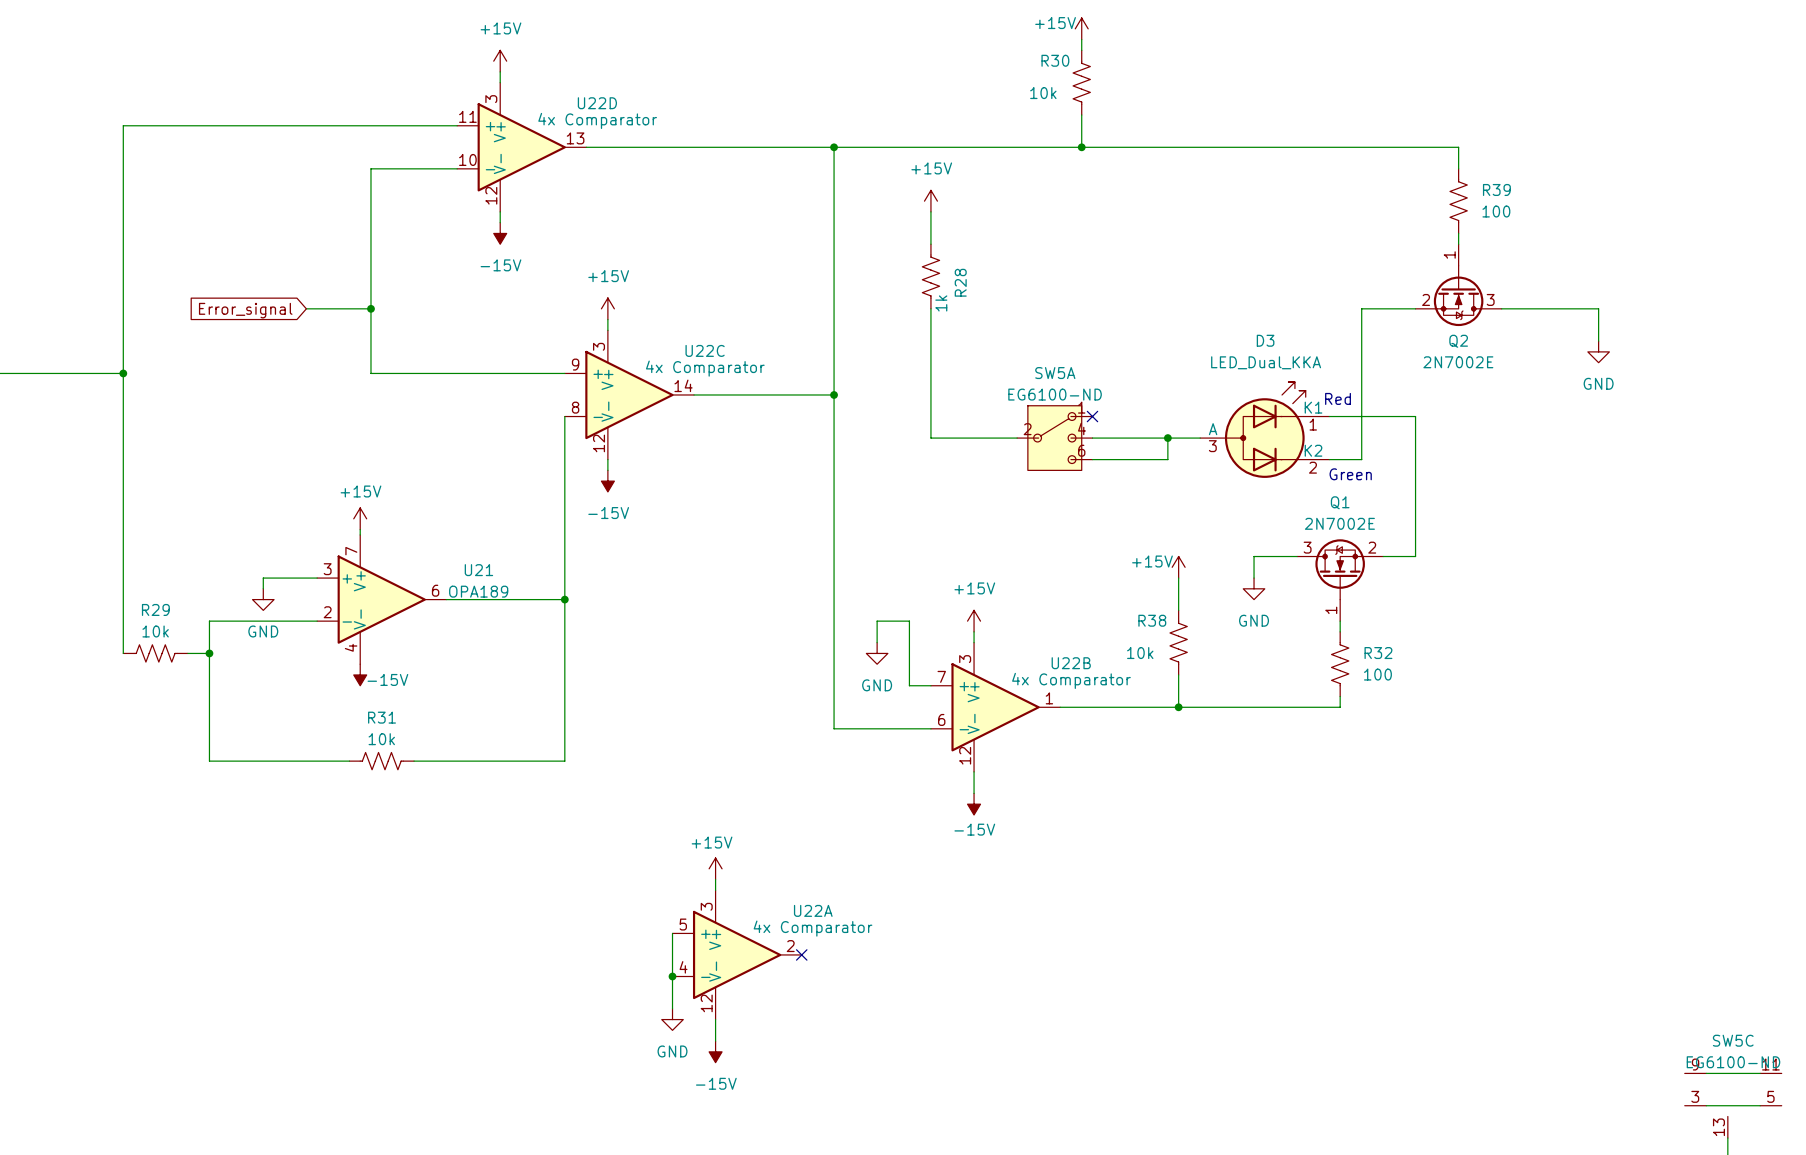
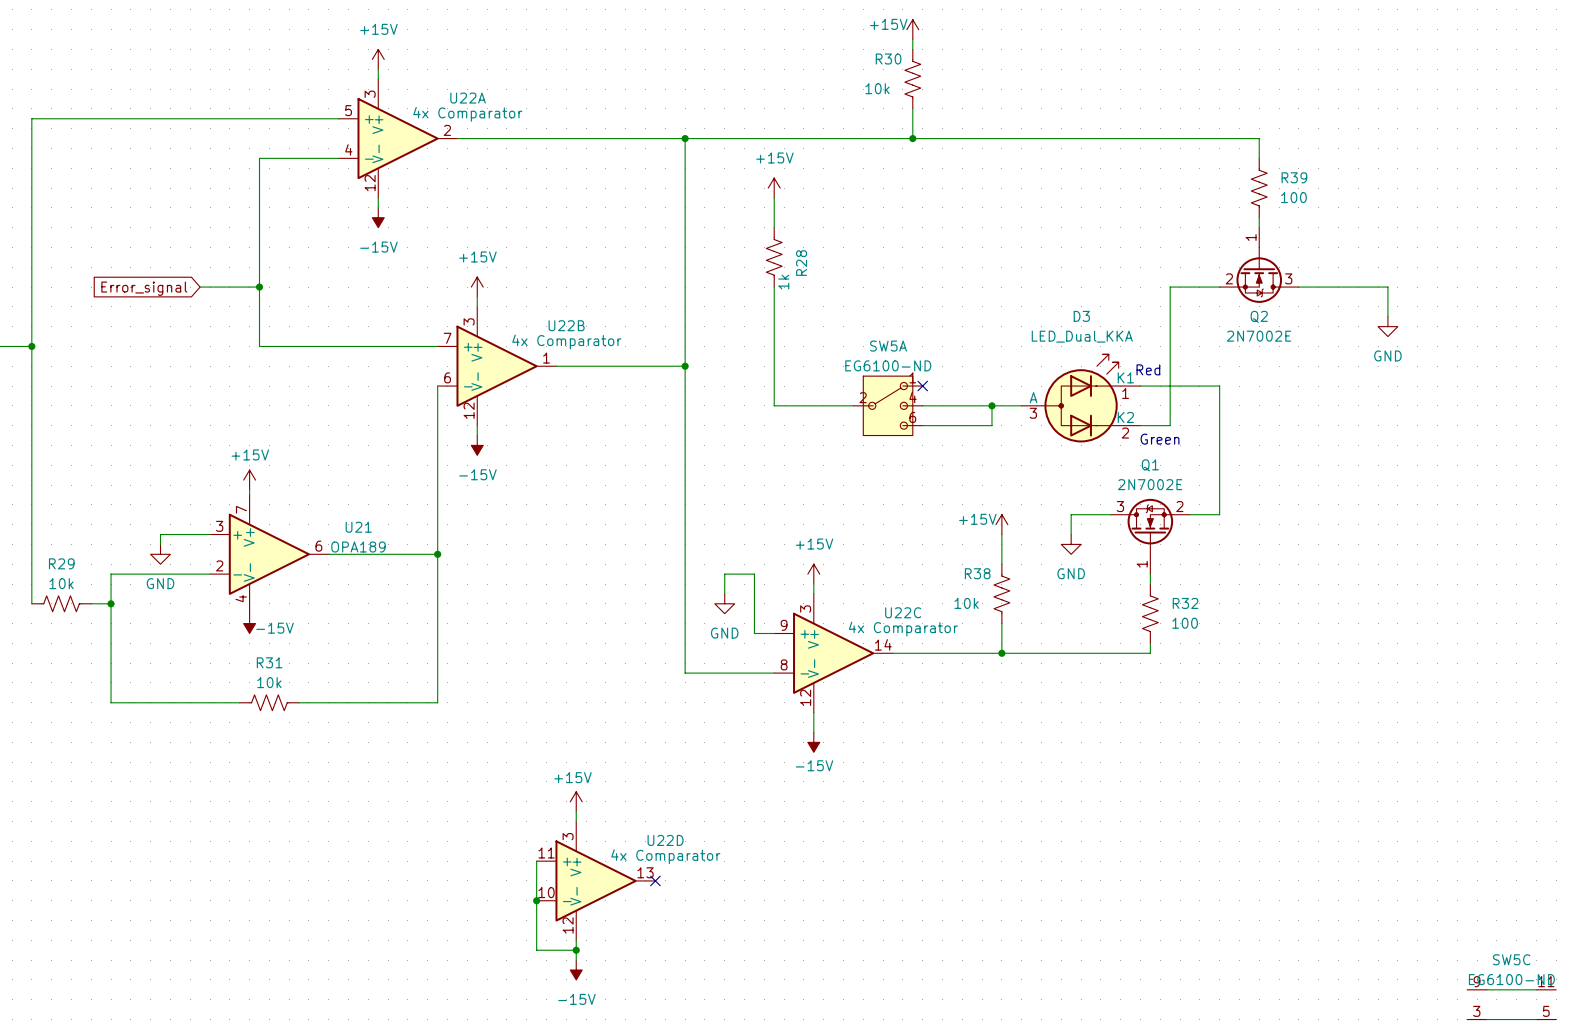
U22D position: (521, 147) -> (596, 880)
U22C position: (629, 394) -> (833, 653)
U22B position: (995, 707) -> (497, 366)
U22A position: (737, 954) -> (398, 138)
wire: none -> (536, 930) (536, 950) (576, 950)
power symbol: GND (672, 1019) -> none
junction: none -> (576, 950)

